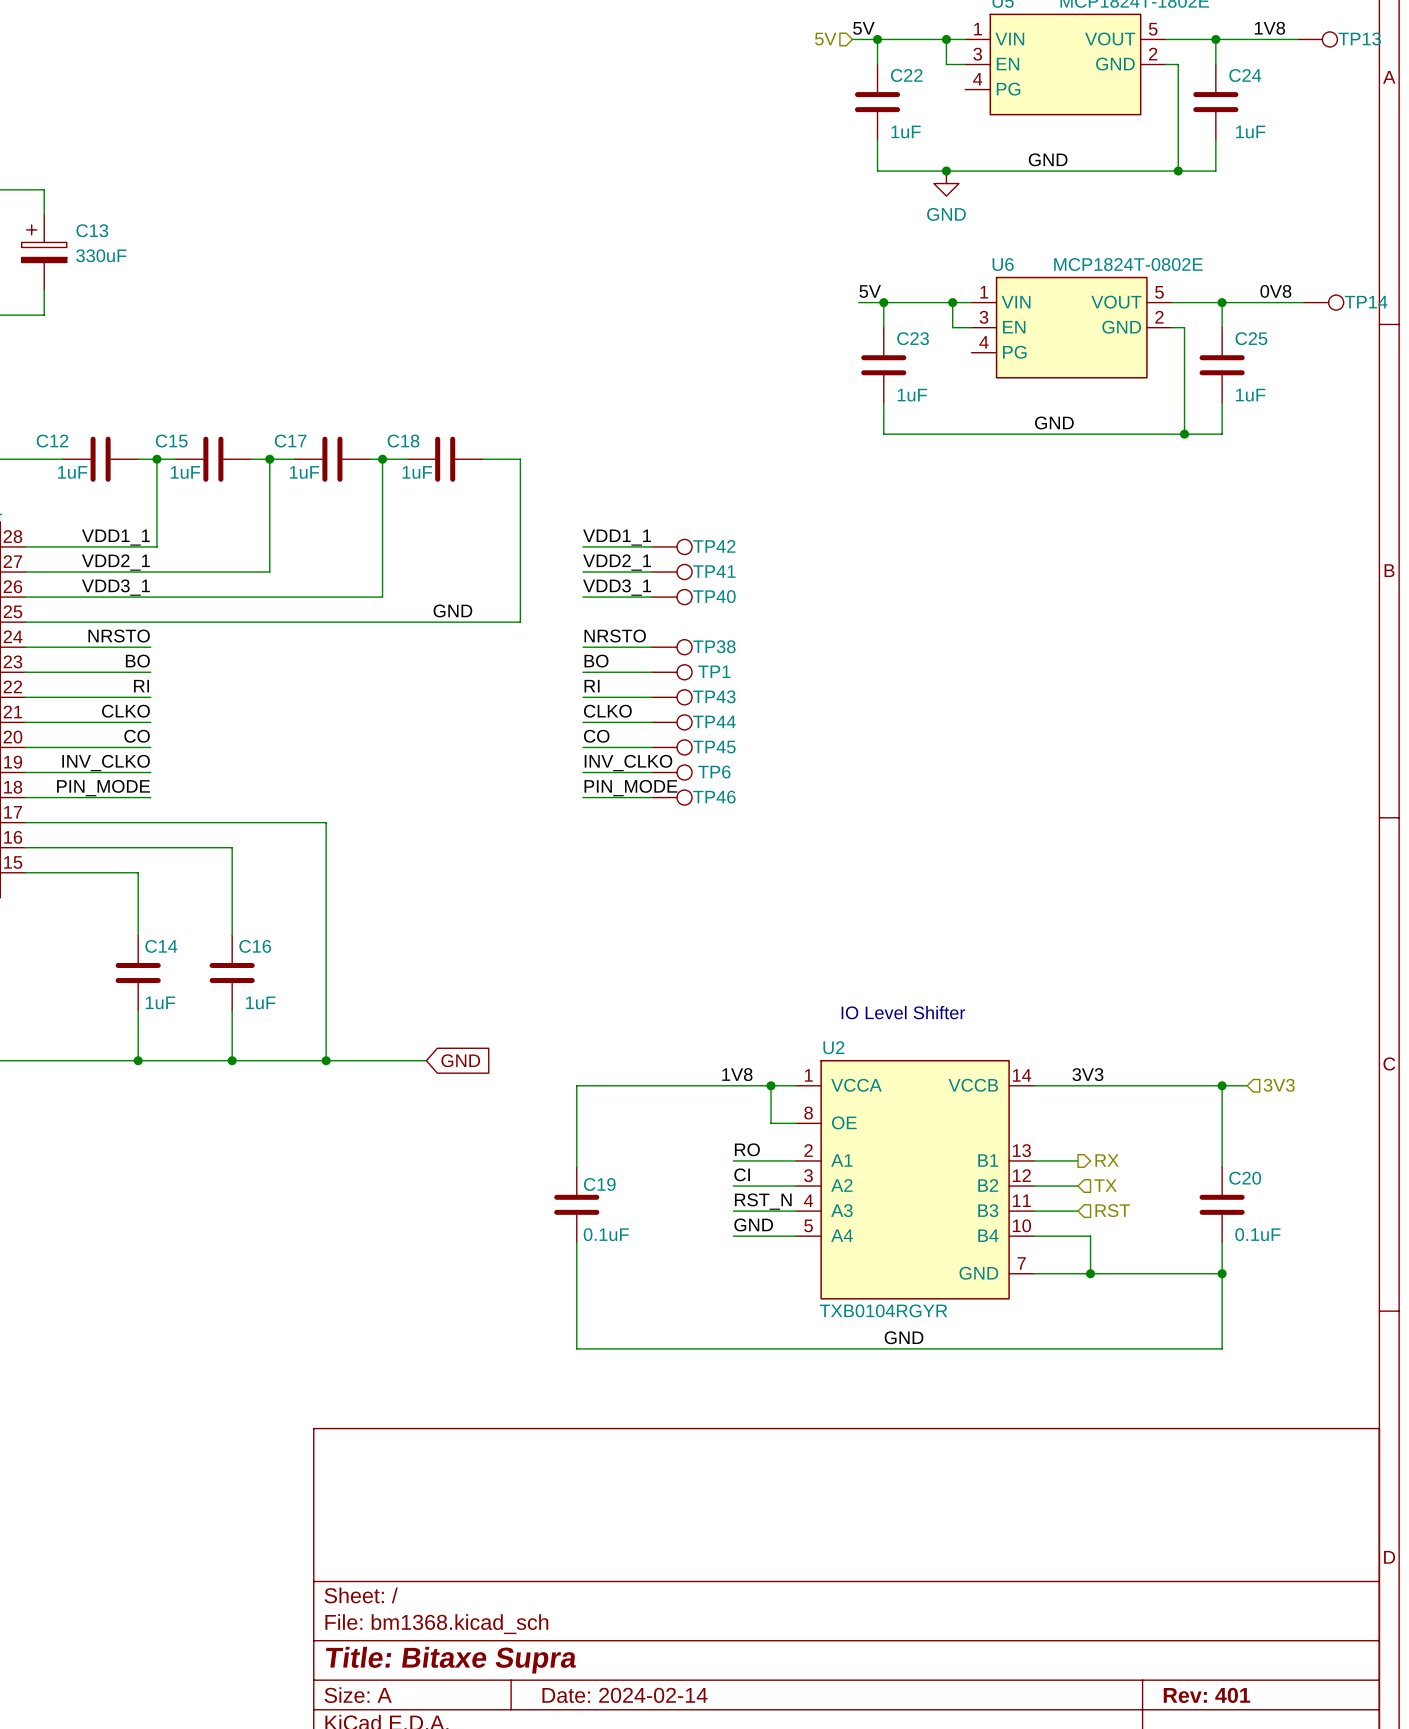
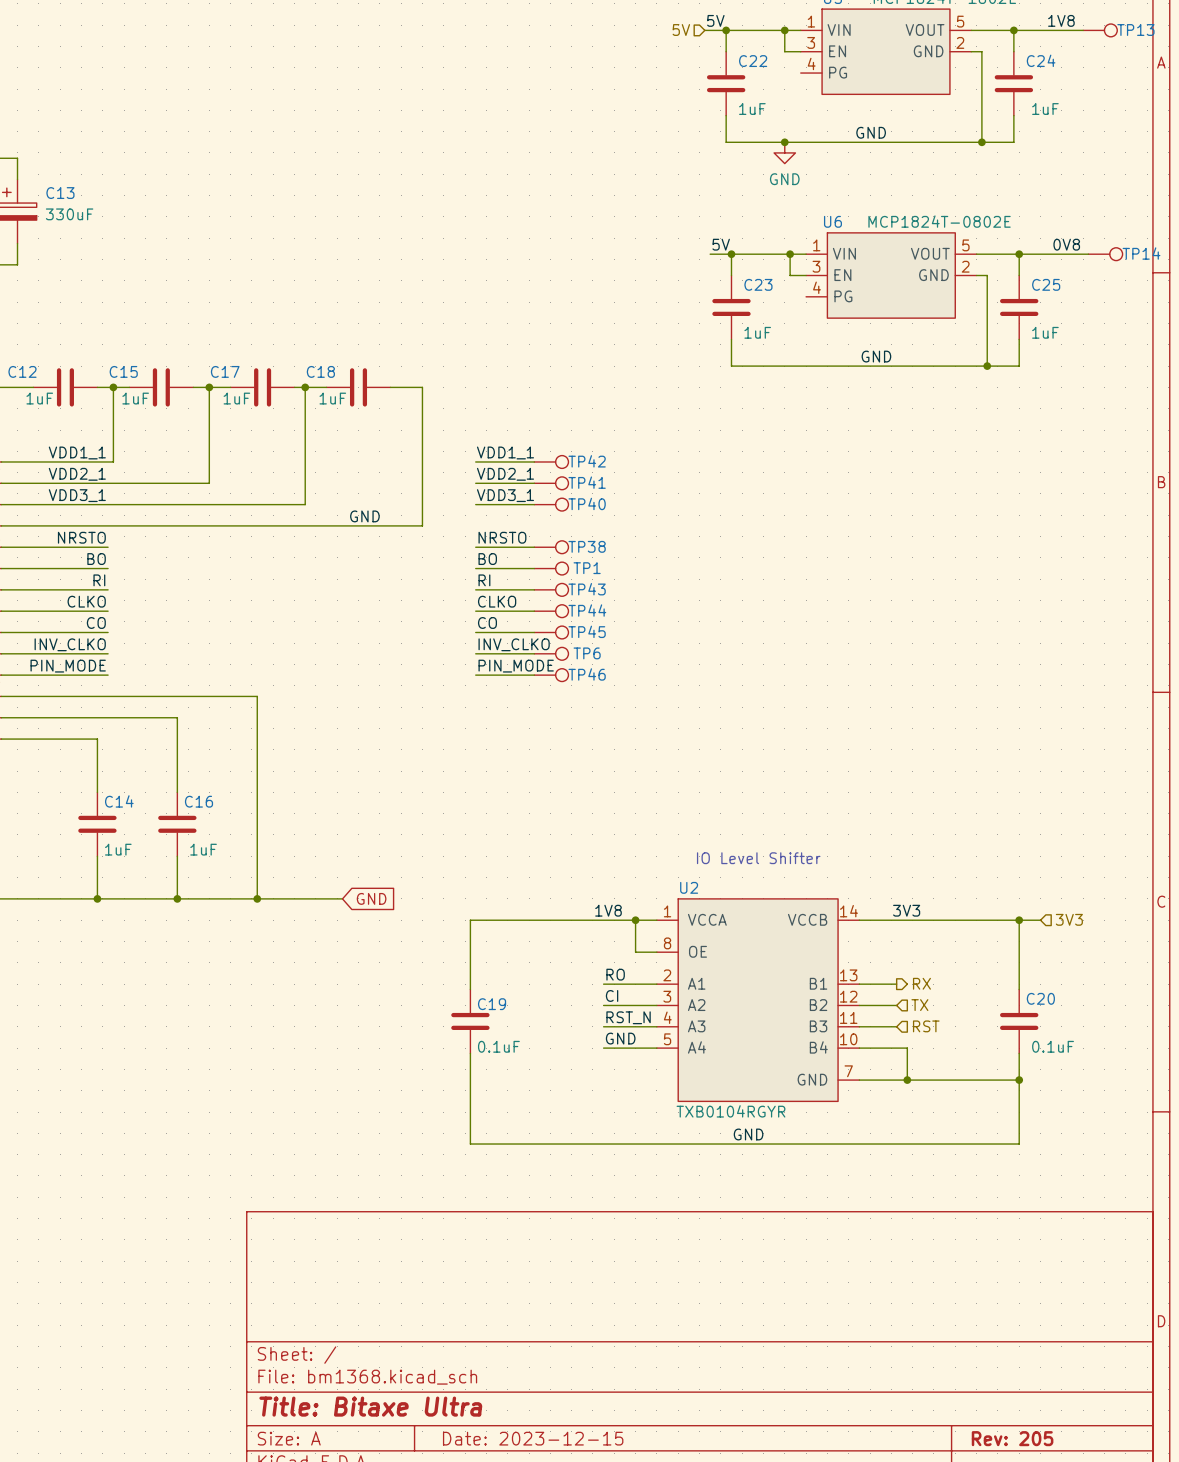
title block: Title: Bitaxe Supra (450, 1660) -> Title: Bitaxe Ultra (370, 1406)
title block: Date: 2024-02-14 (625, 1695) -> Date: 2023-12-15 (533, 1438)
title block: Rev: 401 (1206, 1695) -> Rev: 205 (1012, 1438)

